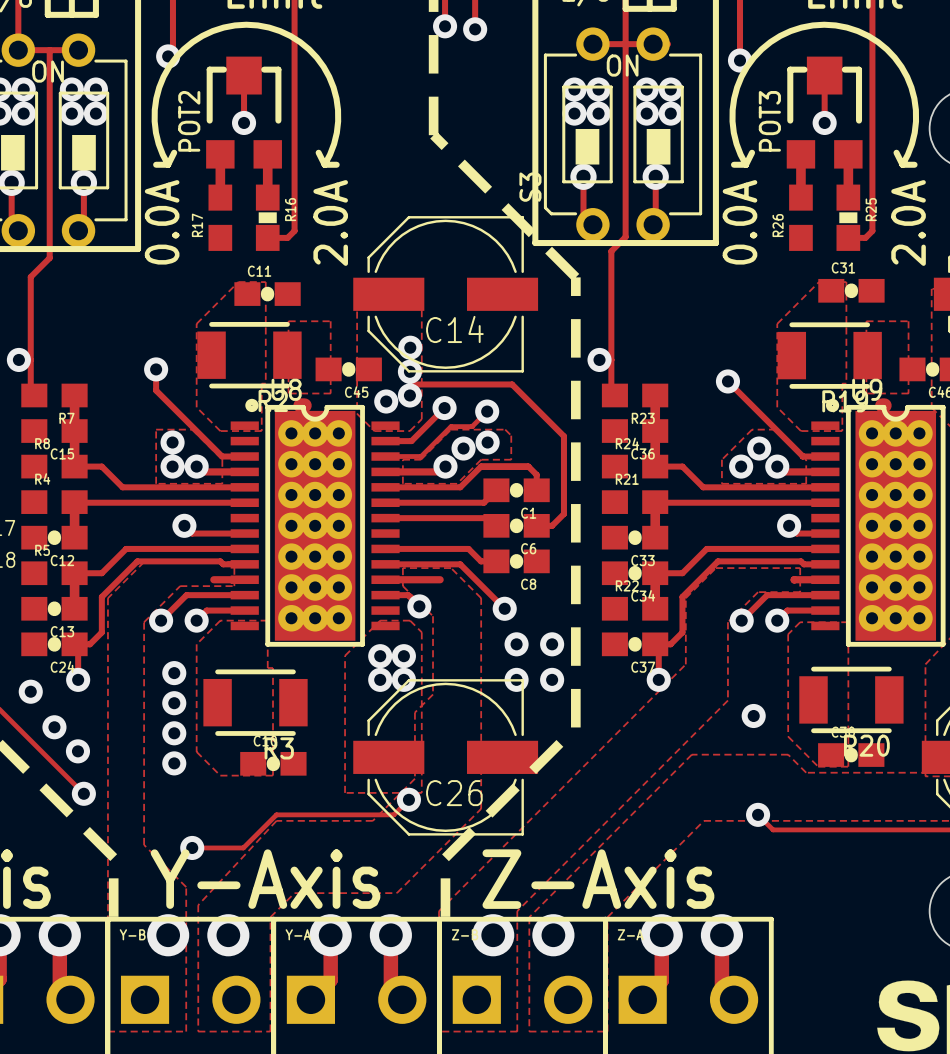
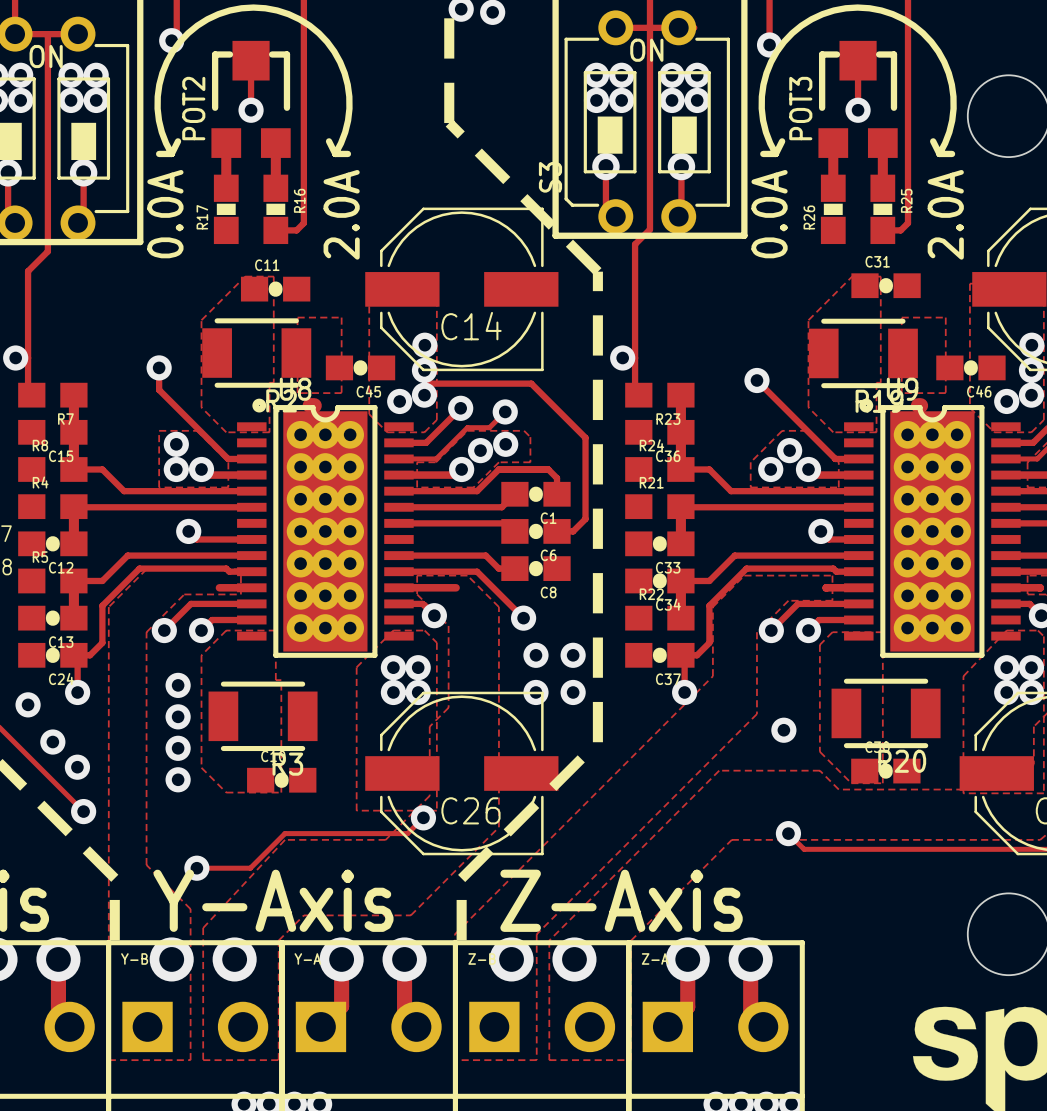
R17 footprint: [208, 184, 233, 251] -> [213, 174, 239, 245]
R26 footprint: [789, 184, 813, 251] -> [820, 174, 846, 245]

